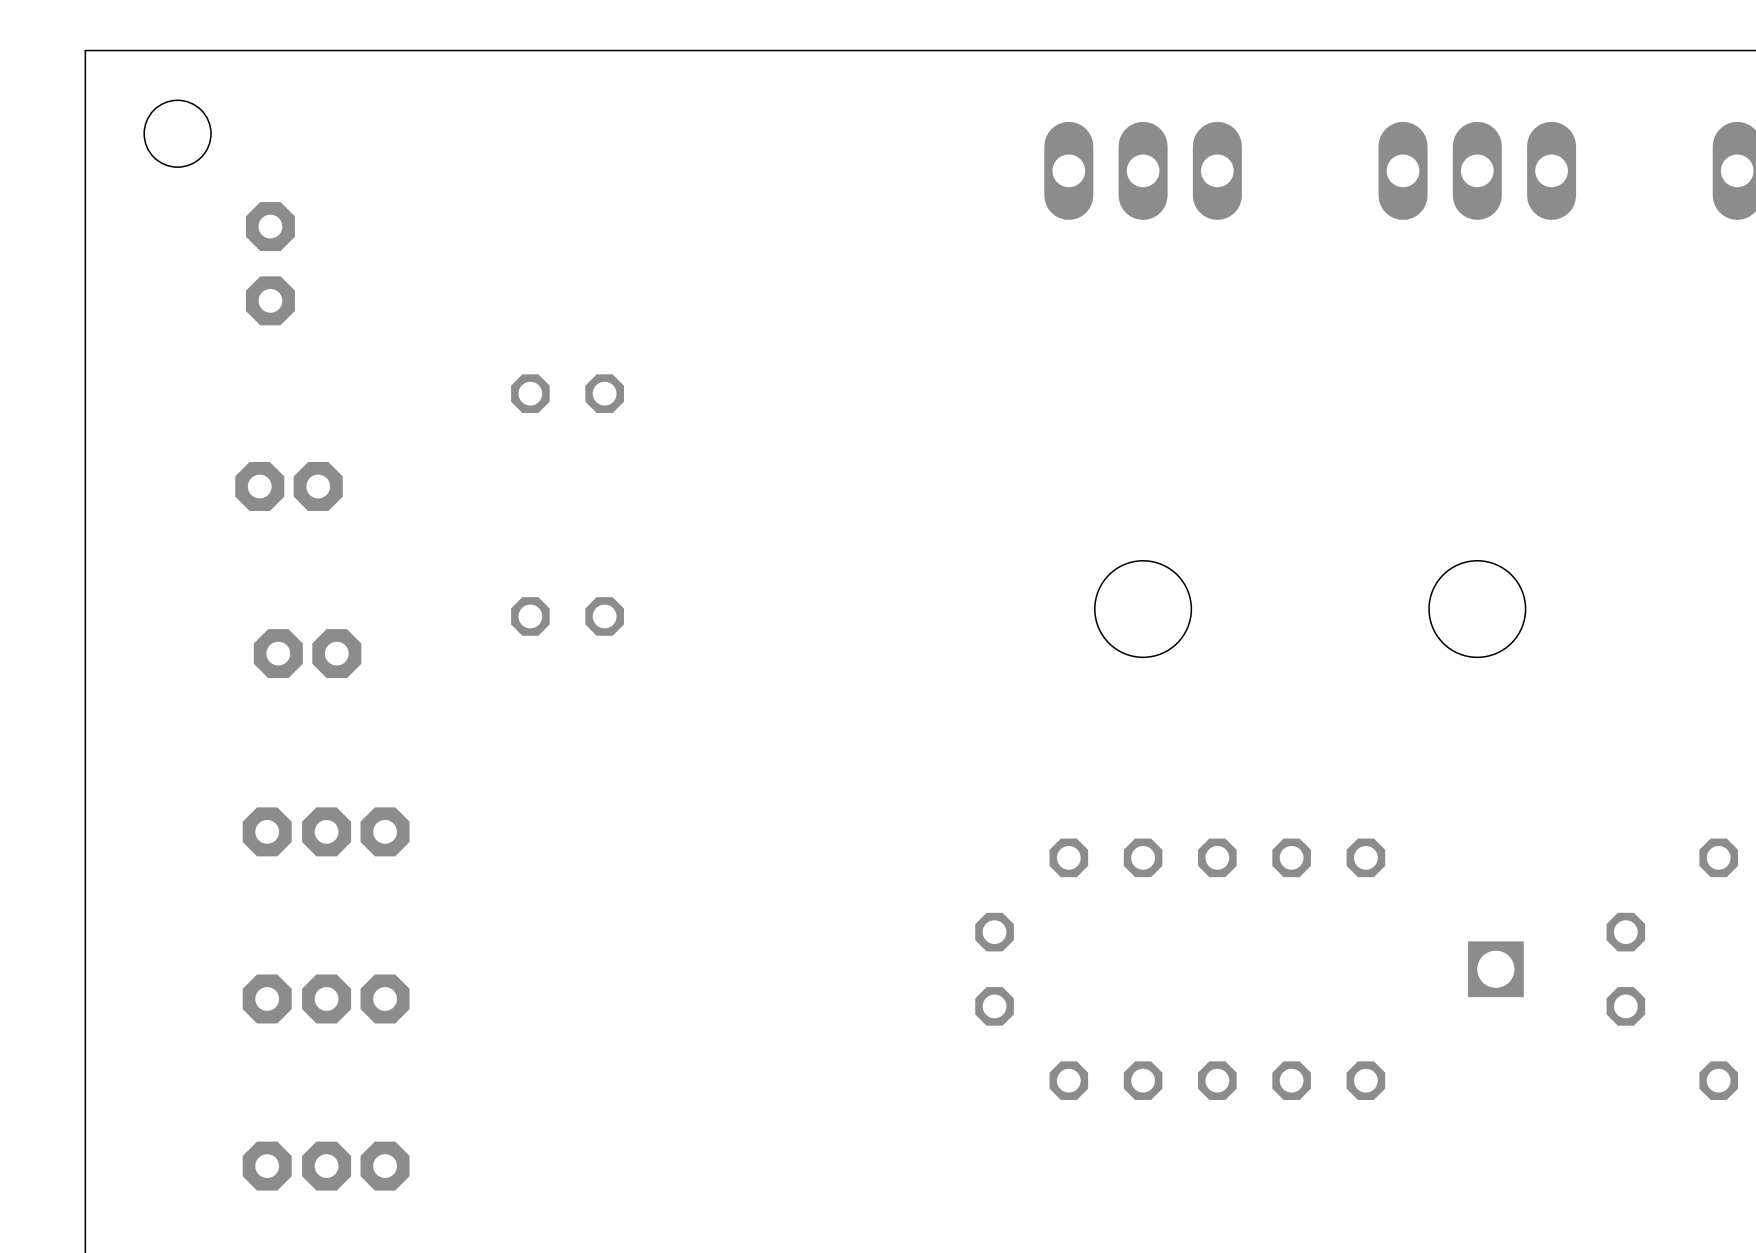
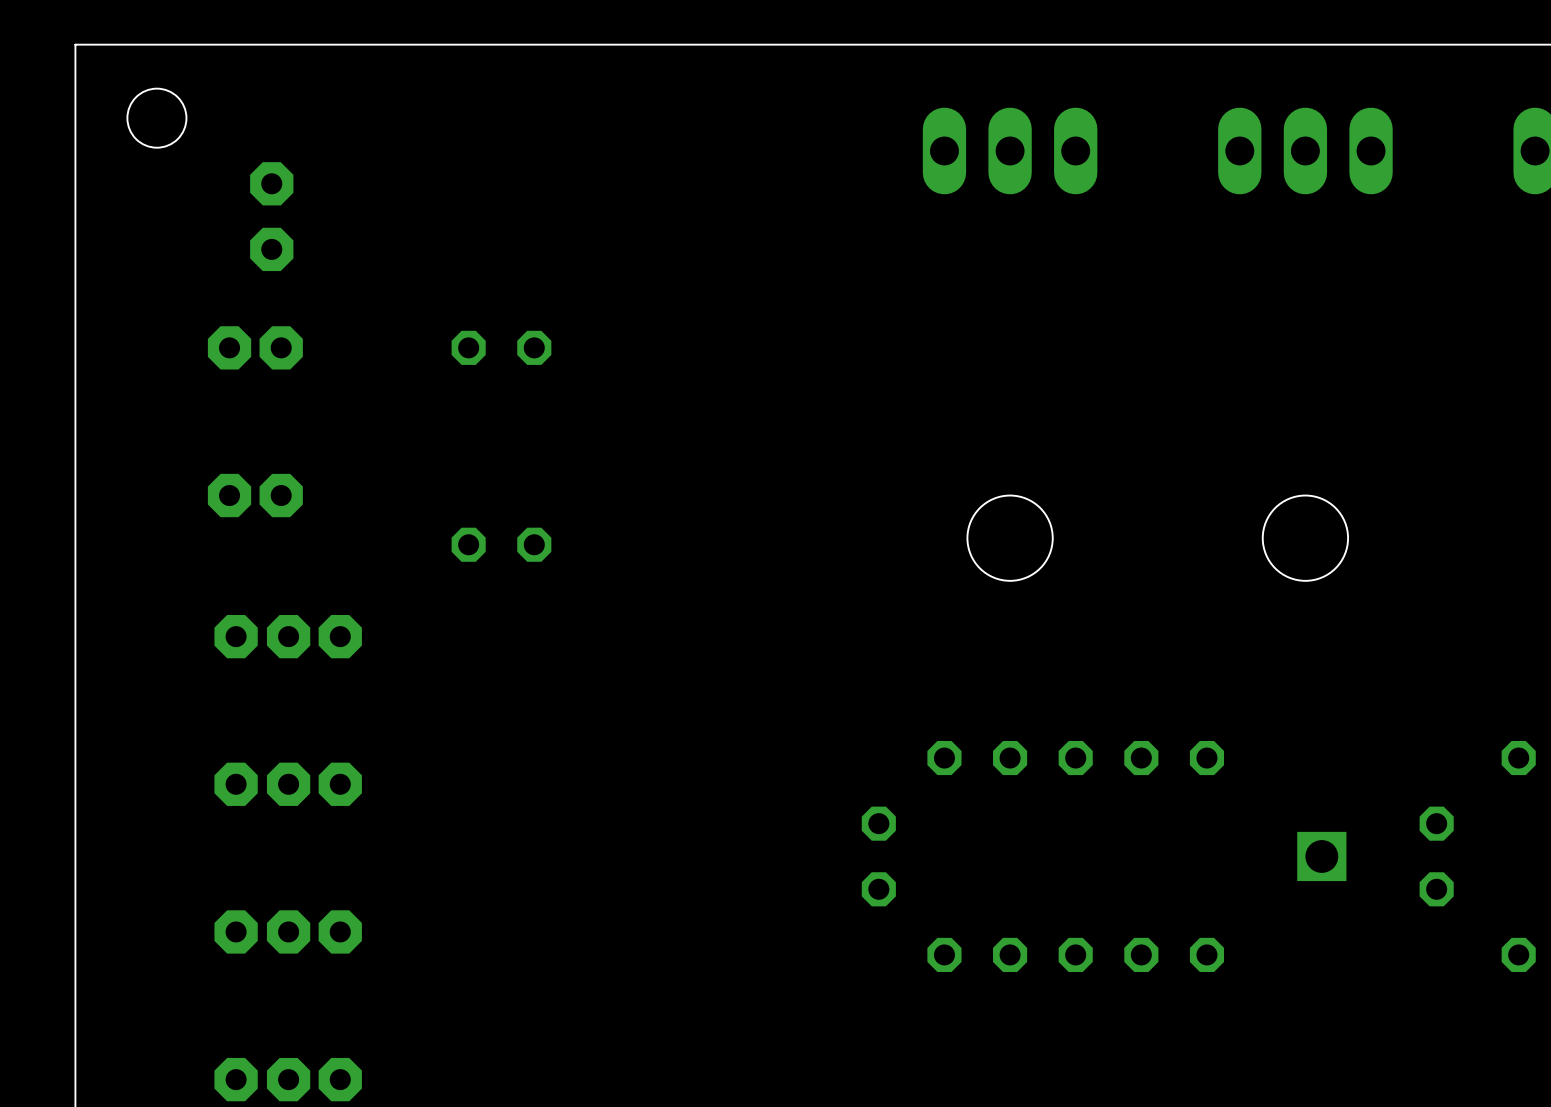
part position: (270, 263) -> (271, 216)
part: none -> (255, 347)
part: (289, 486) -> none
part: none -> (255, 495)
part: (307, 653) -> none
part: none -> (288, 636)
part: (326, 831) -> none
part: none -> (288, 784)
part: (326, 998) -> none
part: none -> (288, 931)
part: (326, 1166) -> none
part: none -> (288, 1079)

